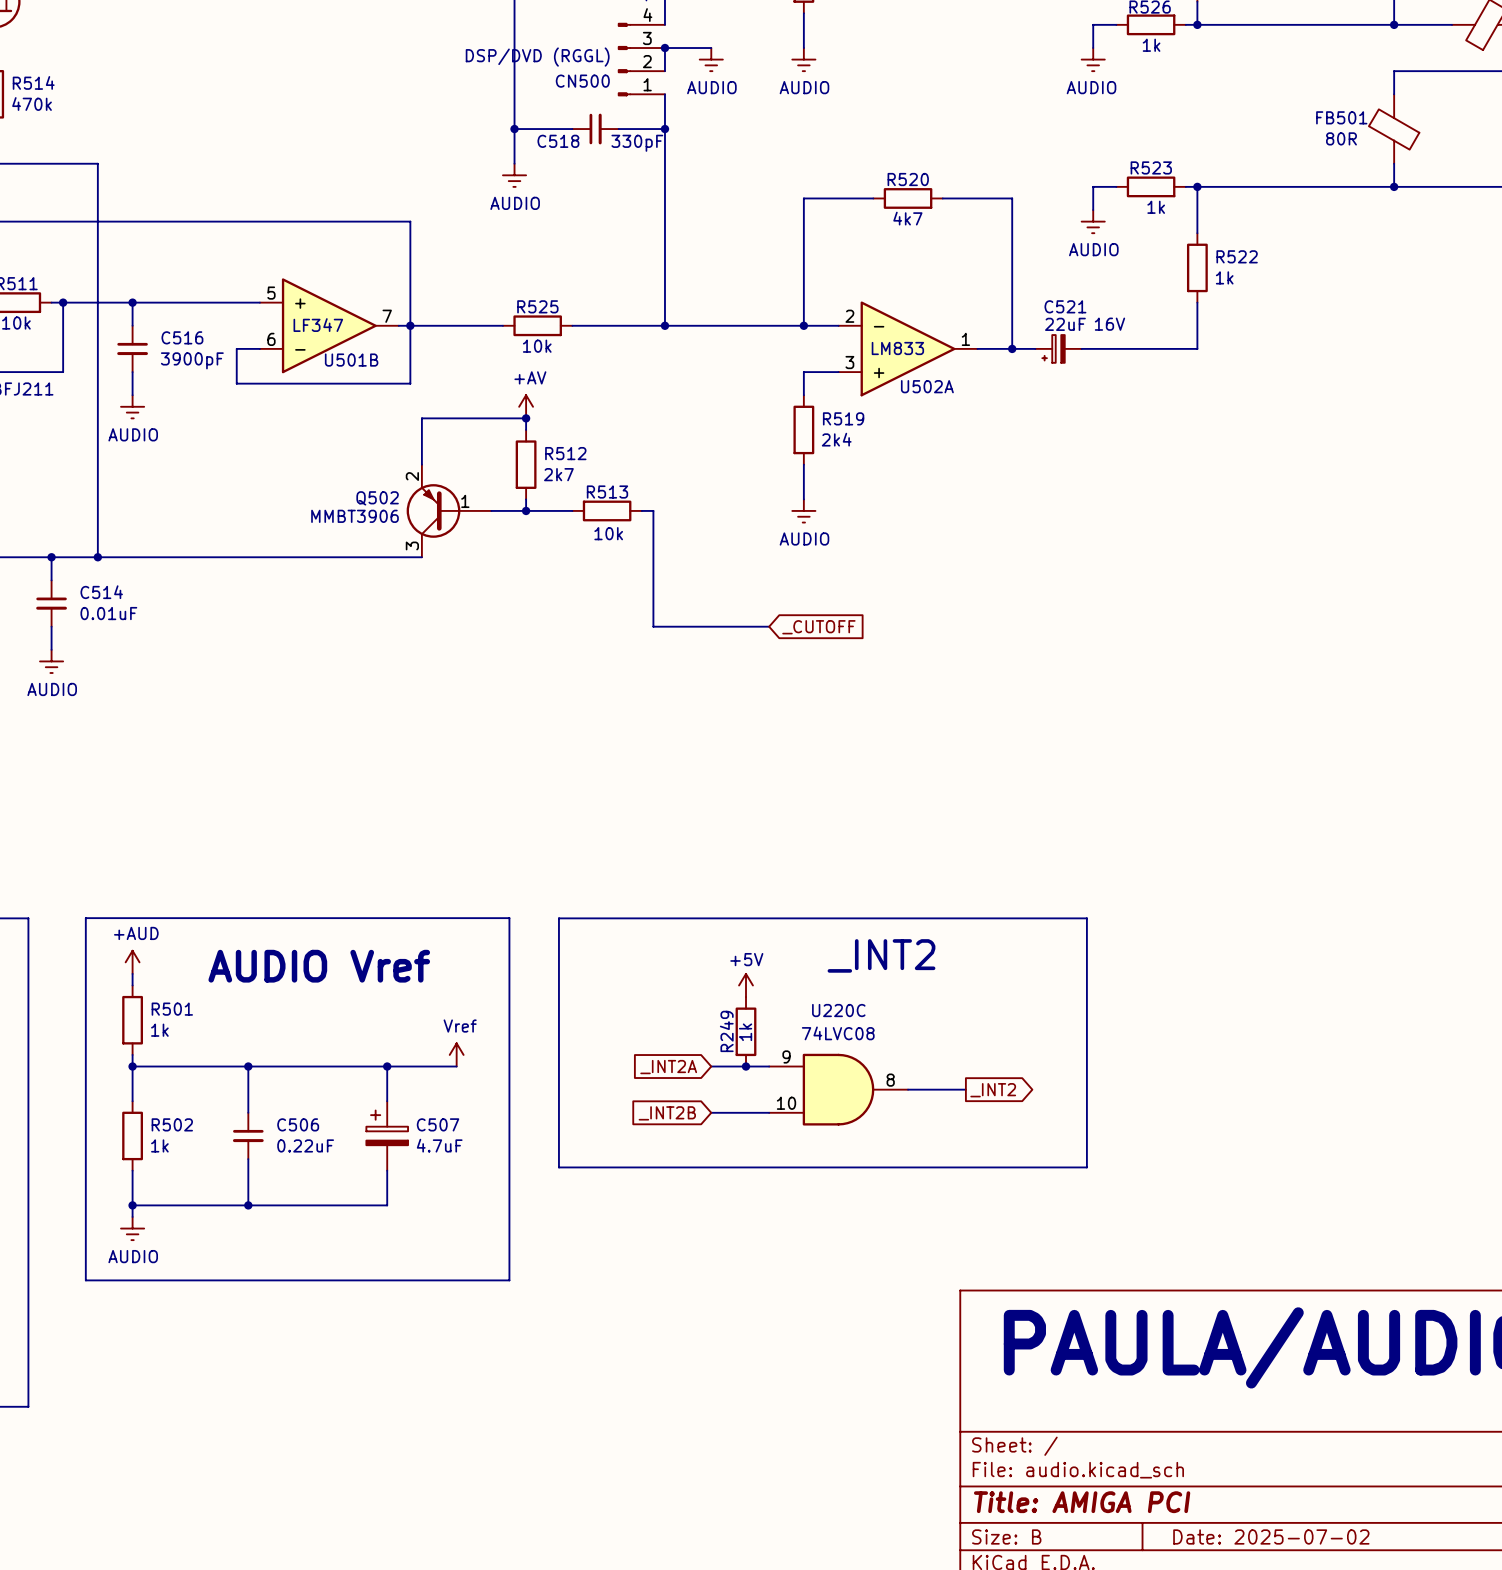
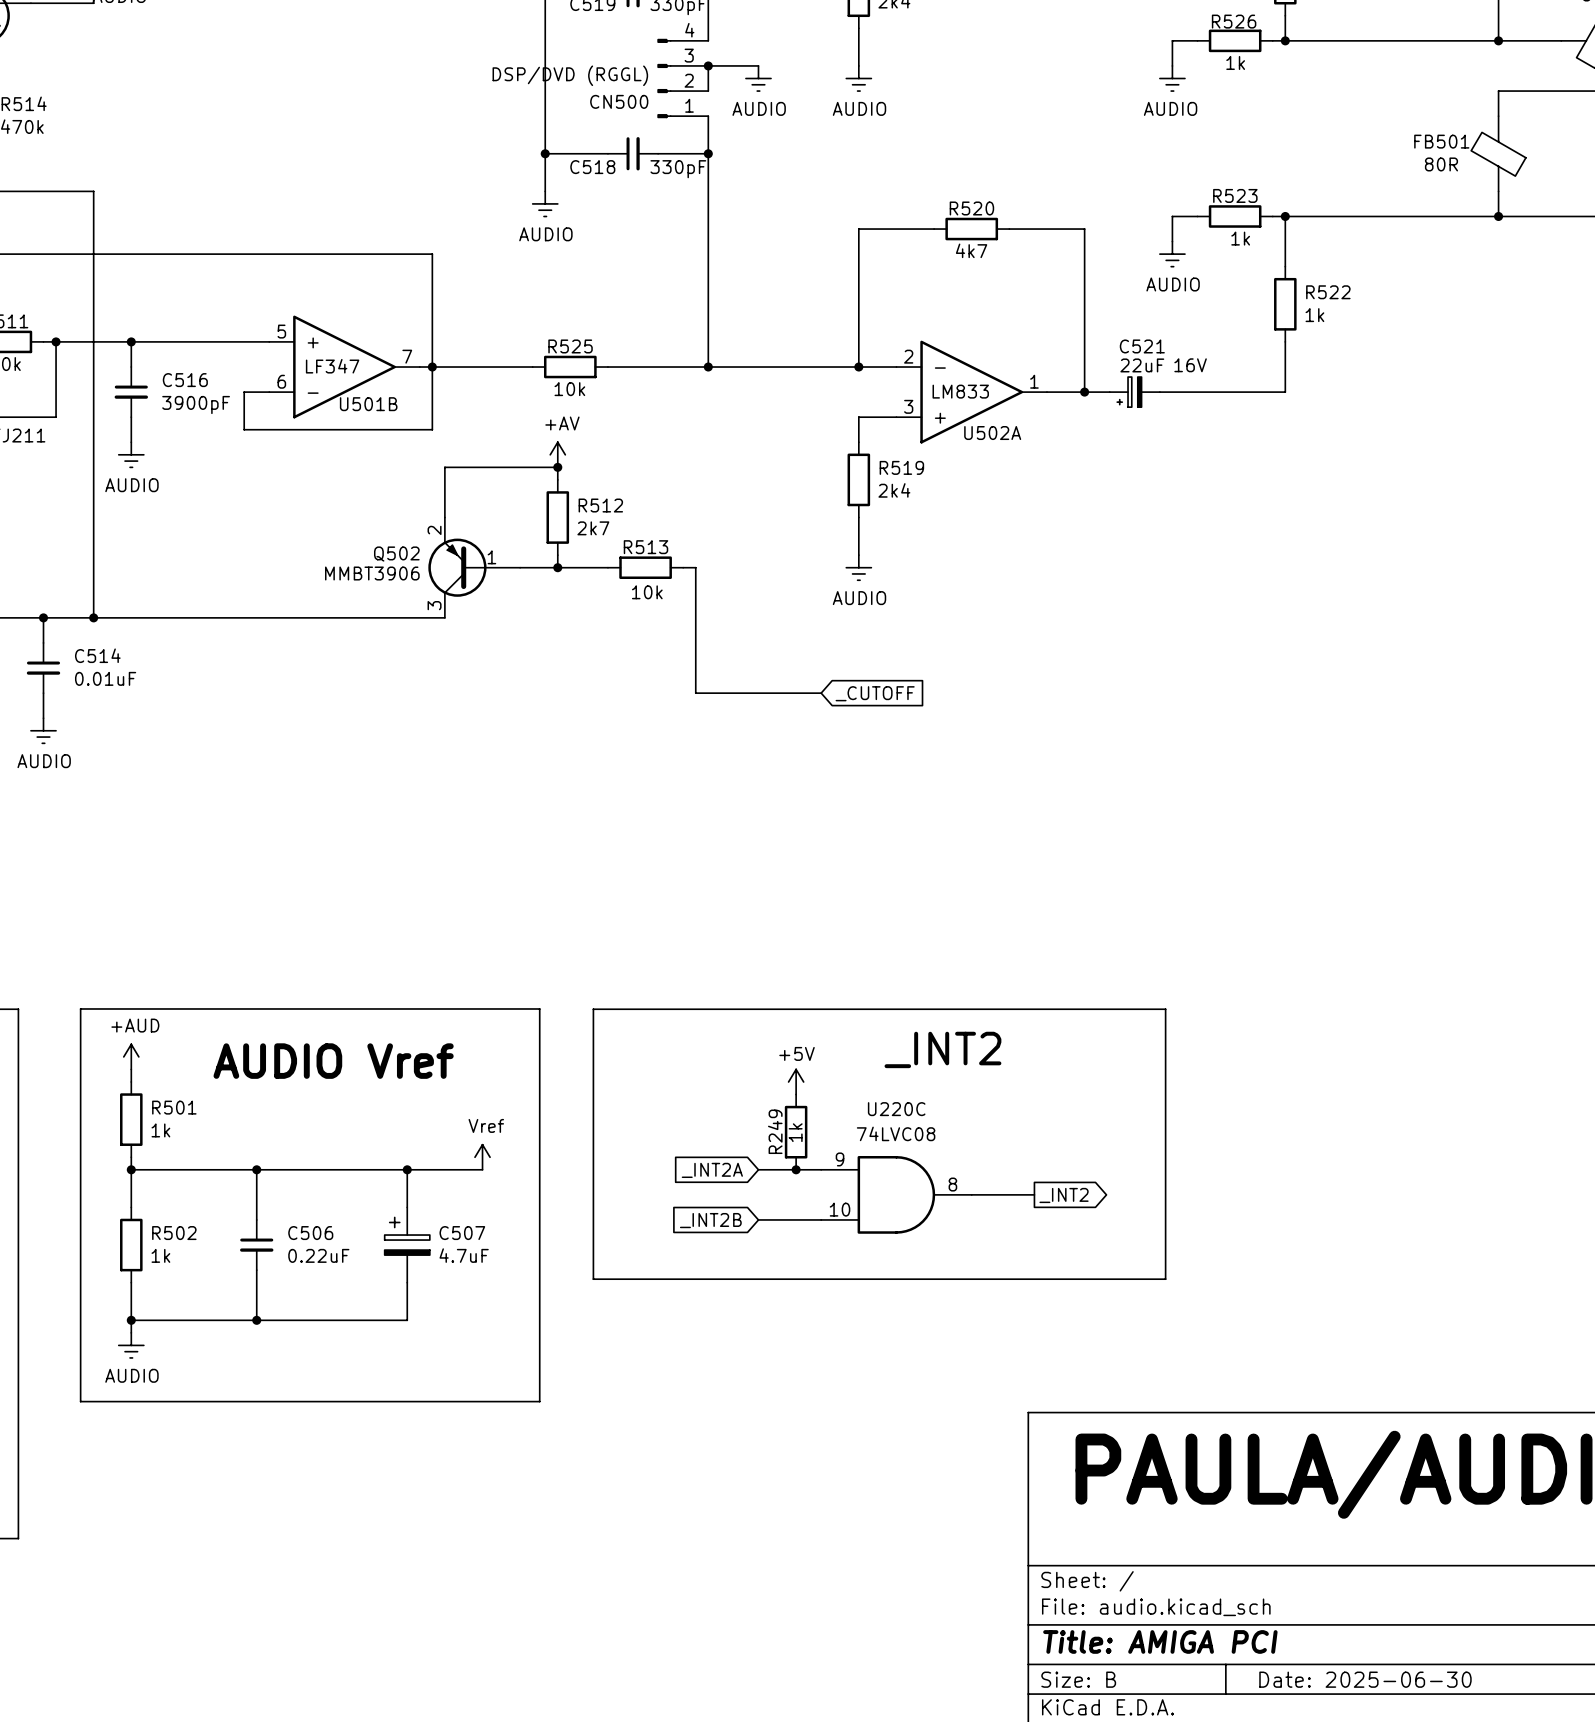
title block: Date: 2025-07-02 (1271, 1536) -> Date: 2025-06-30 (1365, 1679)

